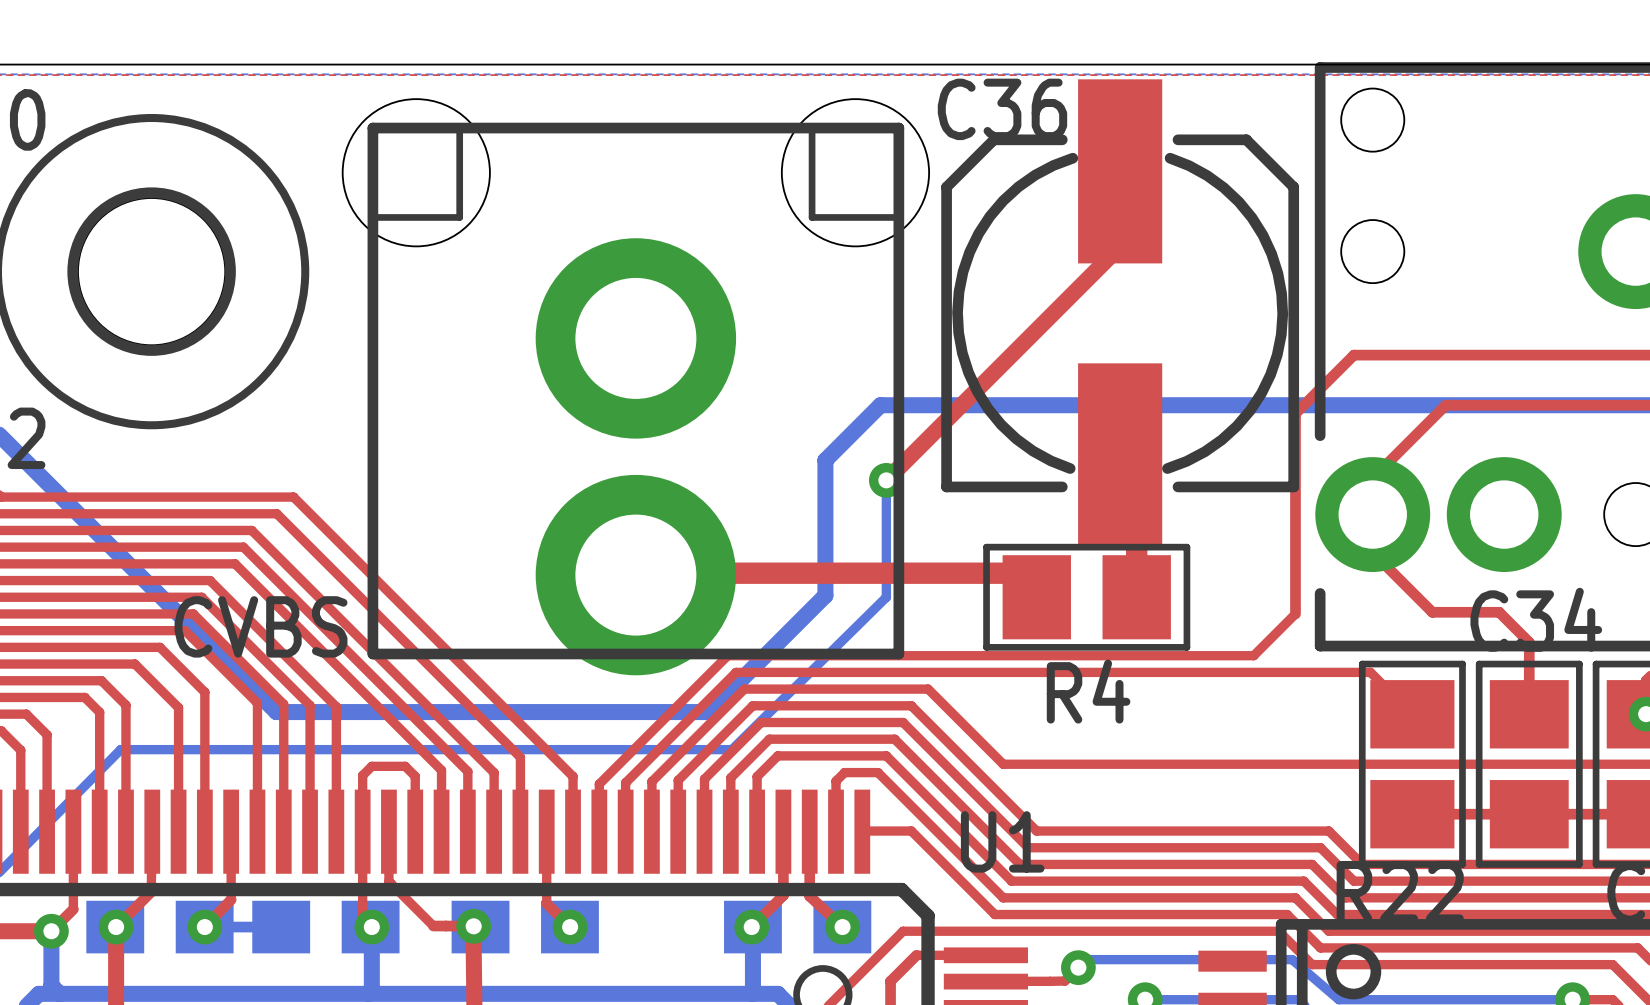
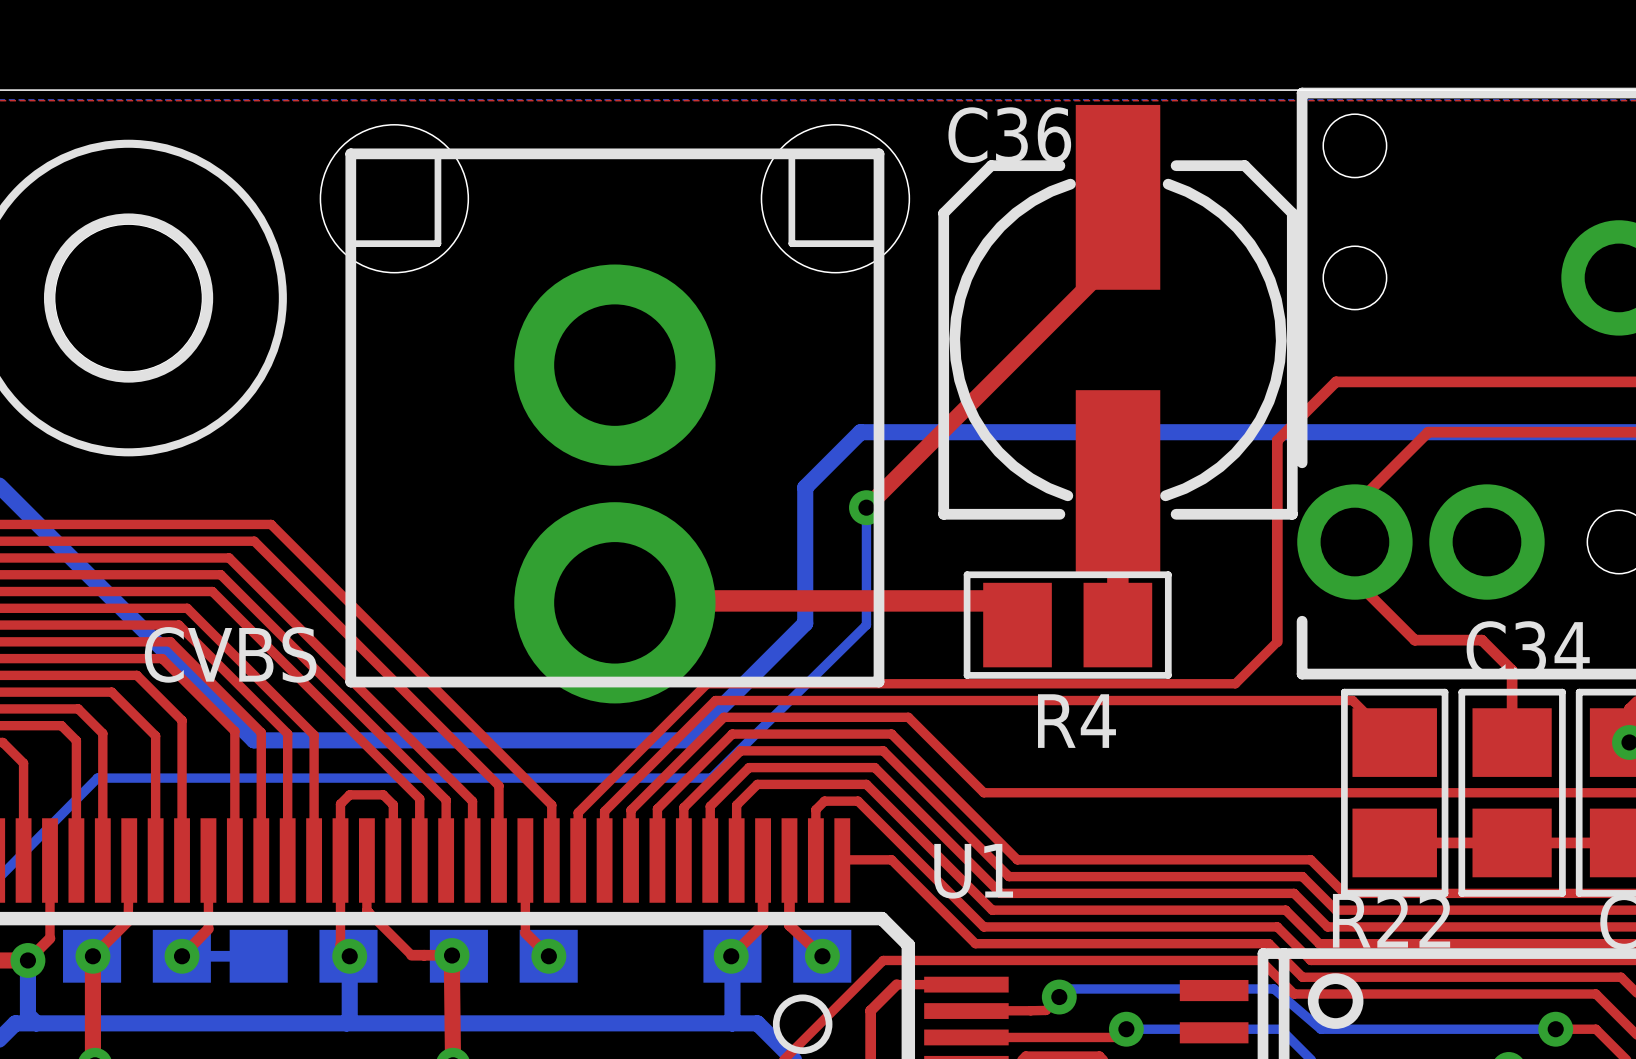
C36 position: (1120, 313) -> (1118, 339)

